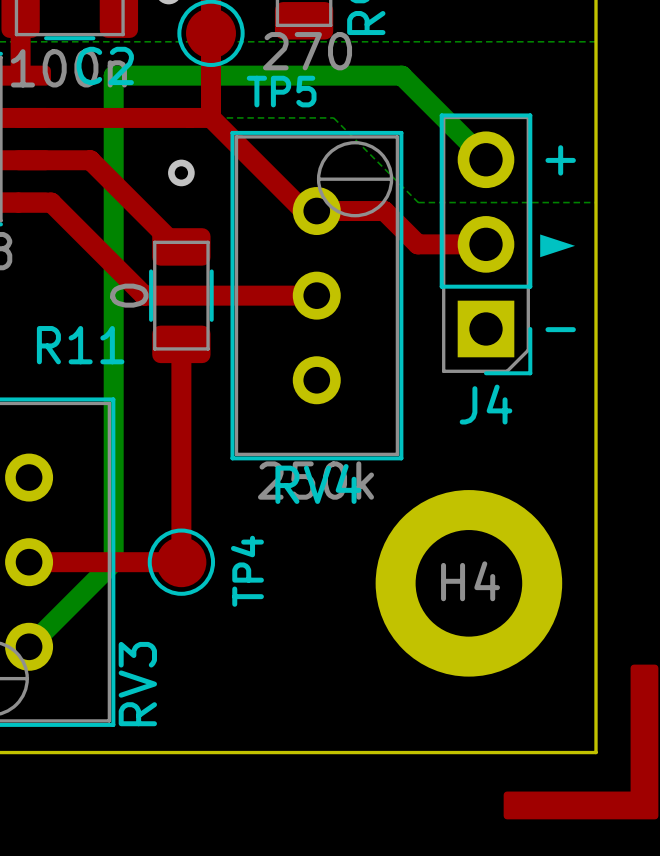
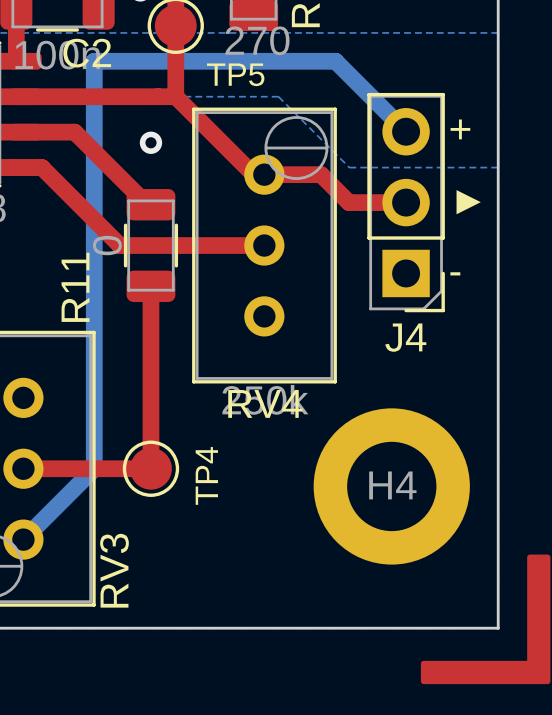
R11 name rotation: 0° (80, 345) -> 90° counterclockwise (75, 287)

